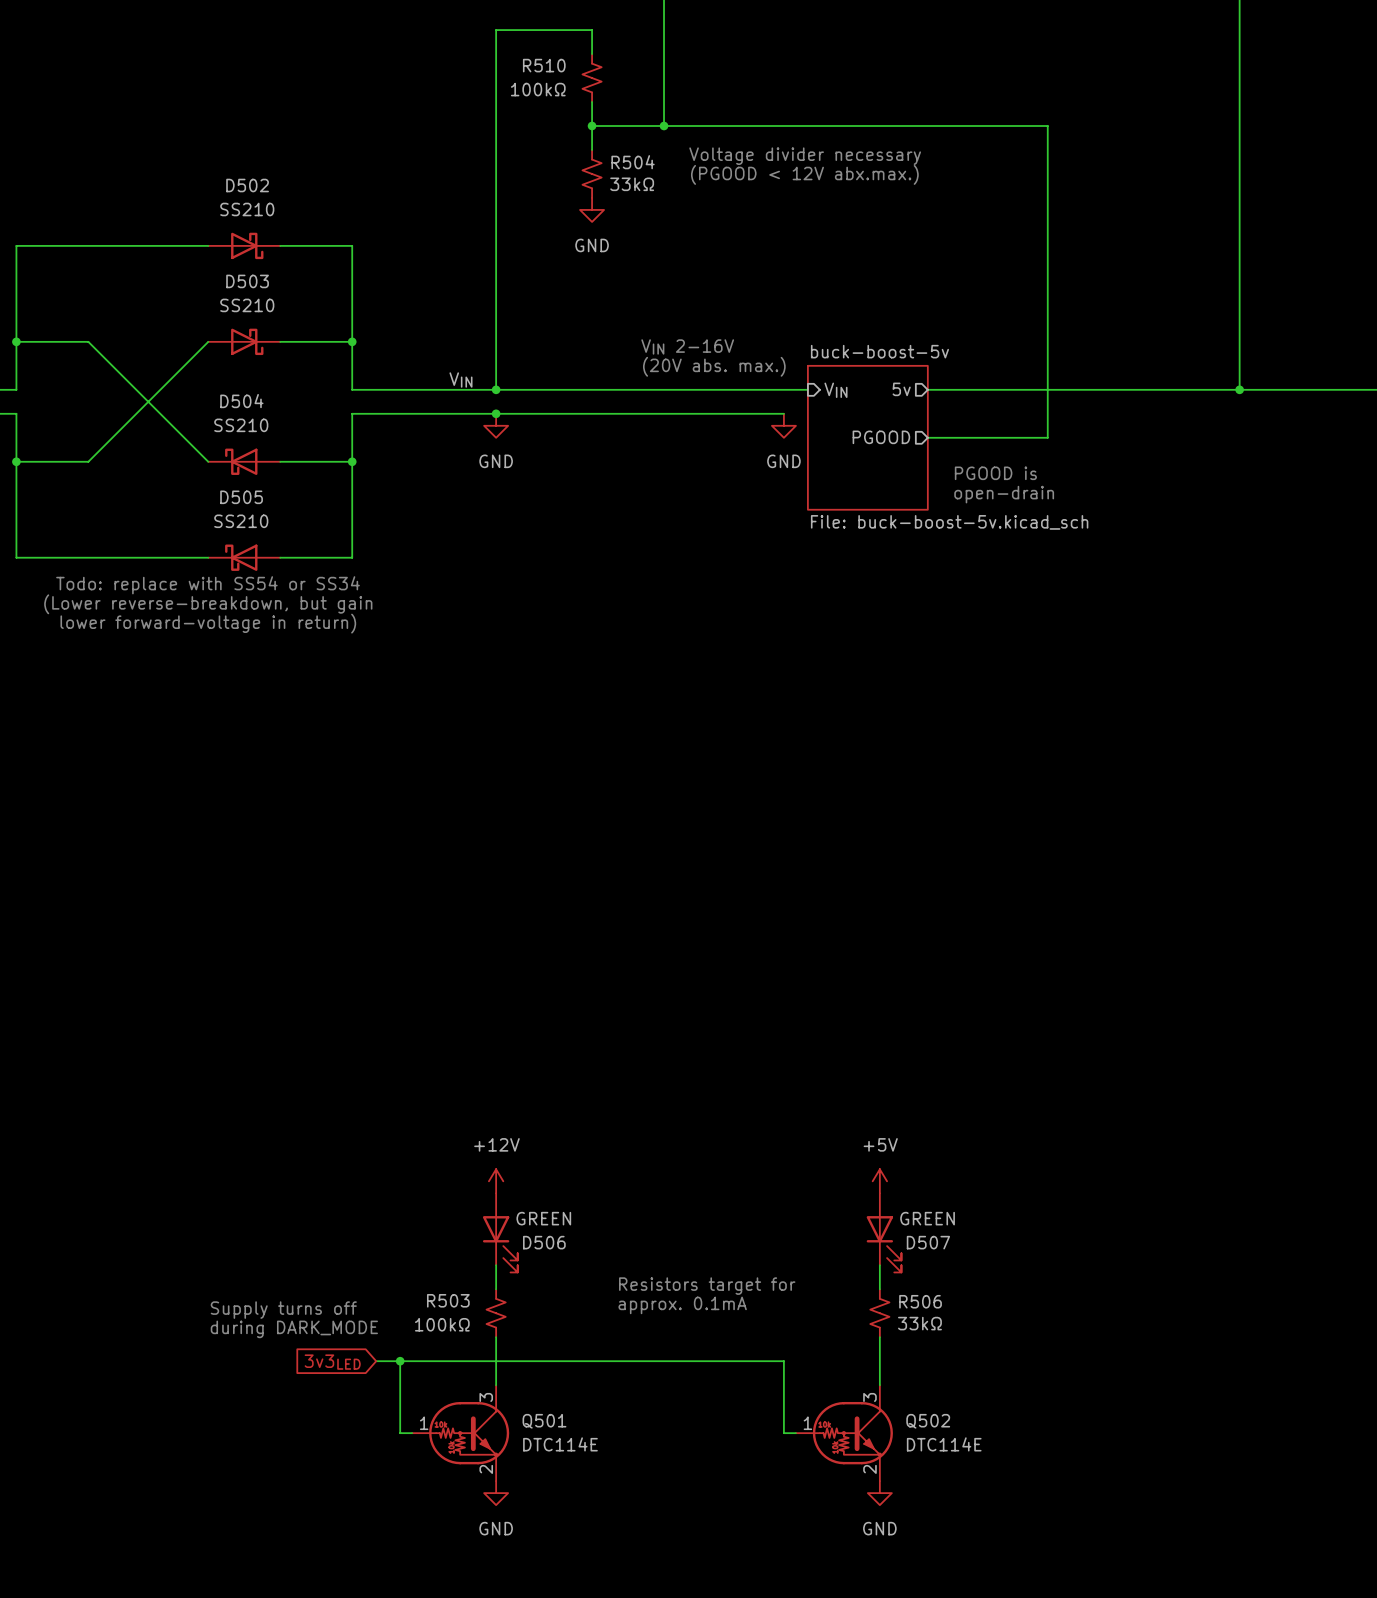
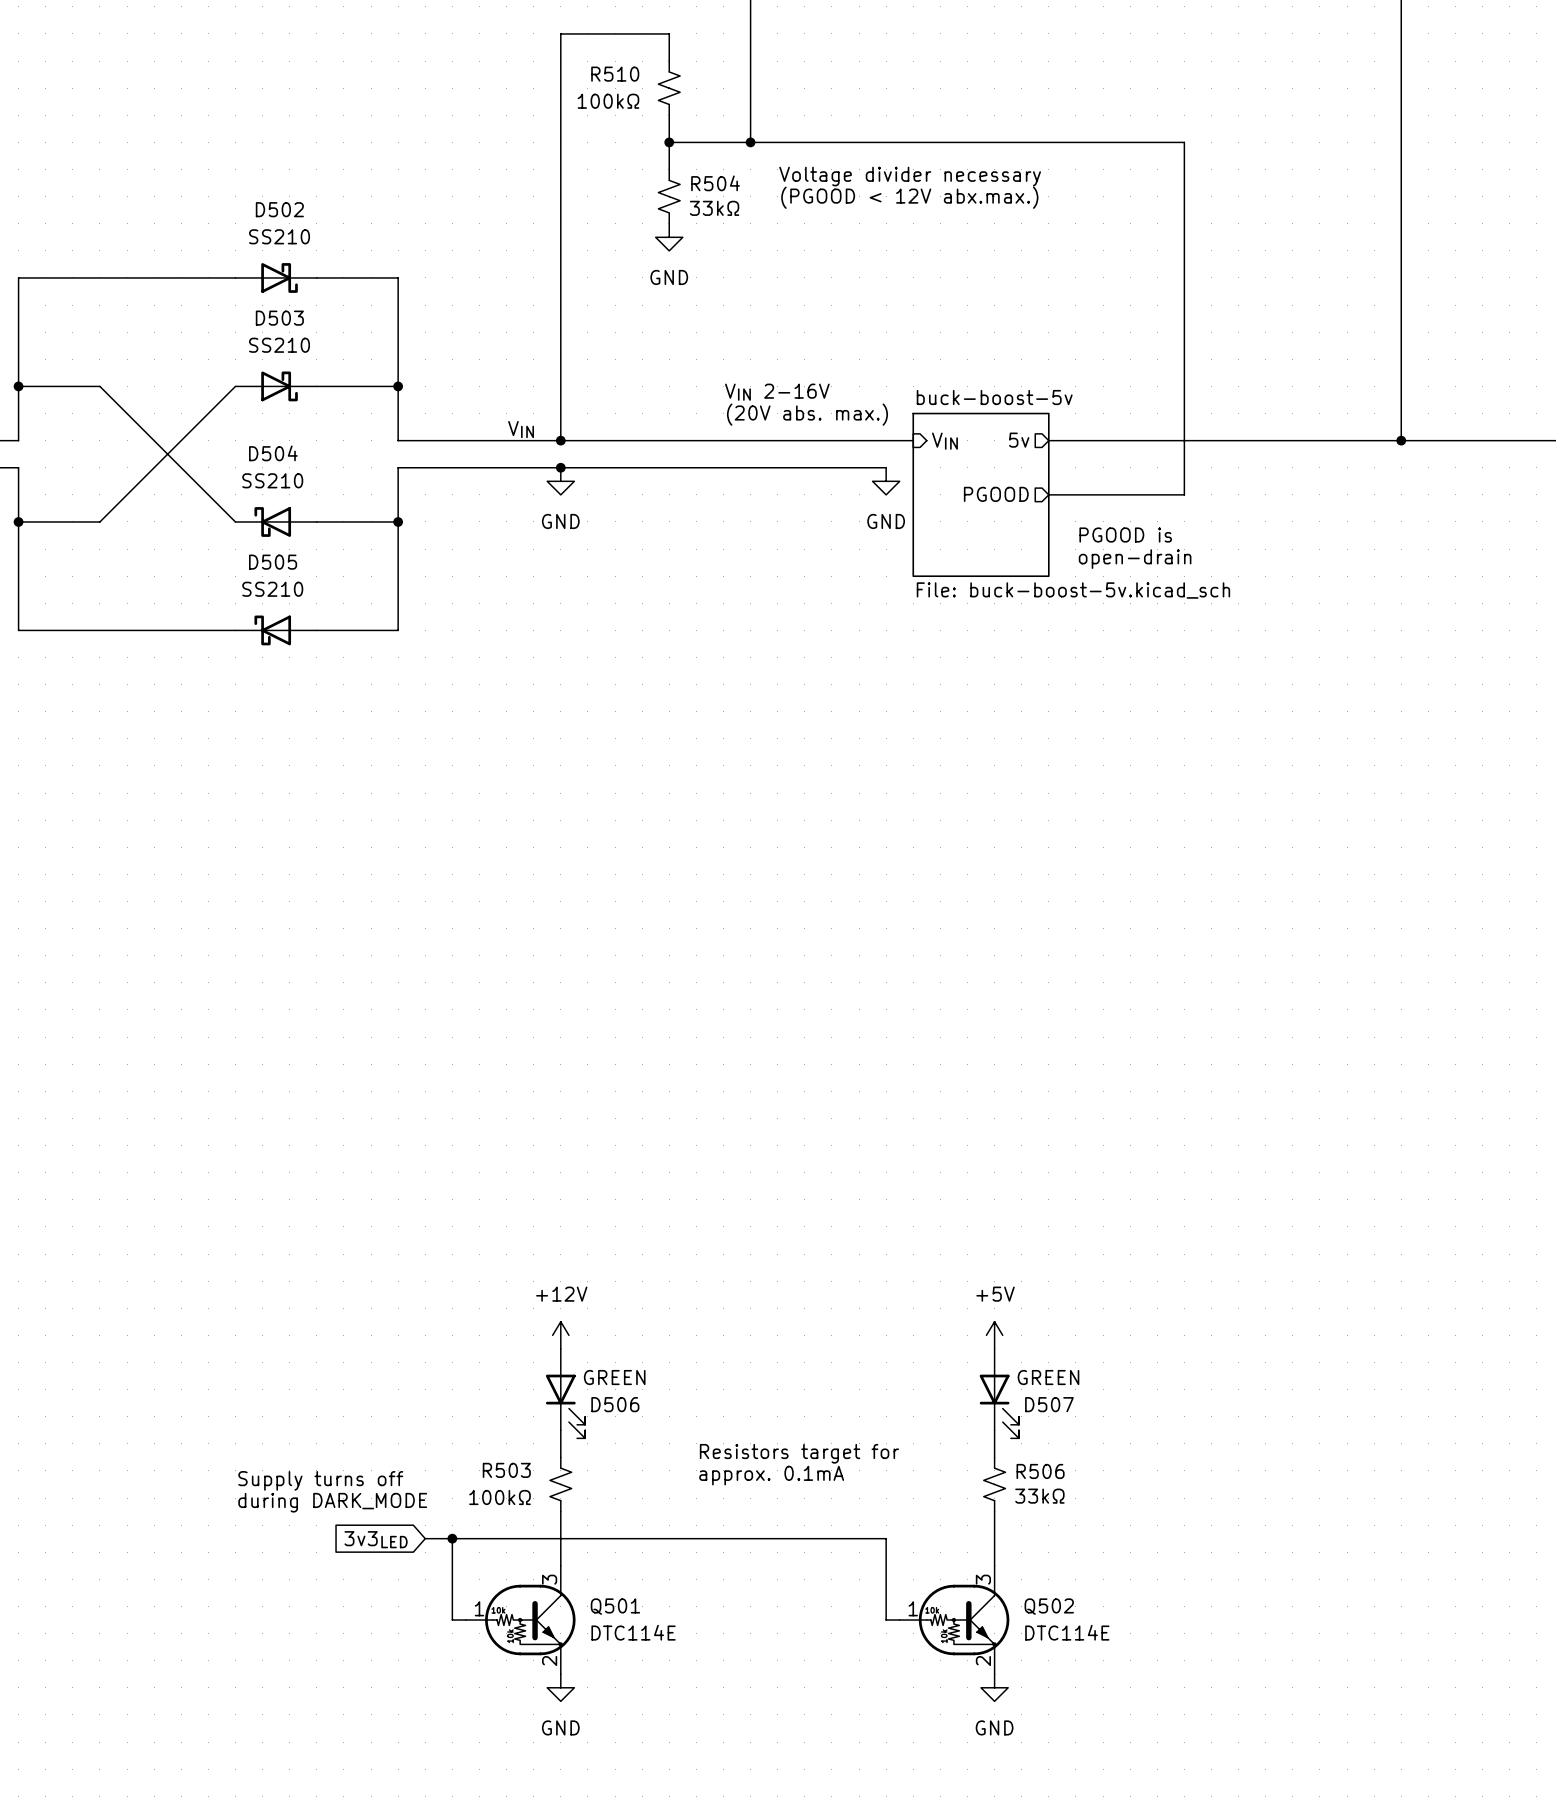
text: Todo: replace with SS54 or SS34 (208, 585) -> none
text: (Lower reverse-breakdown, but gain (208, 604) -> none
text: lower forward-voltage in return) (208, 623) -> none

